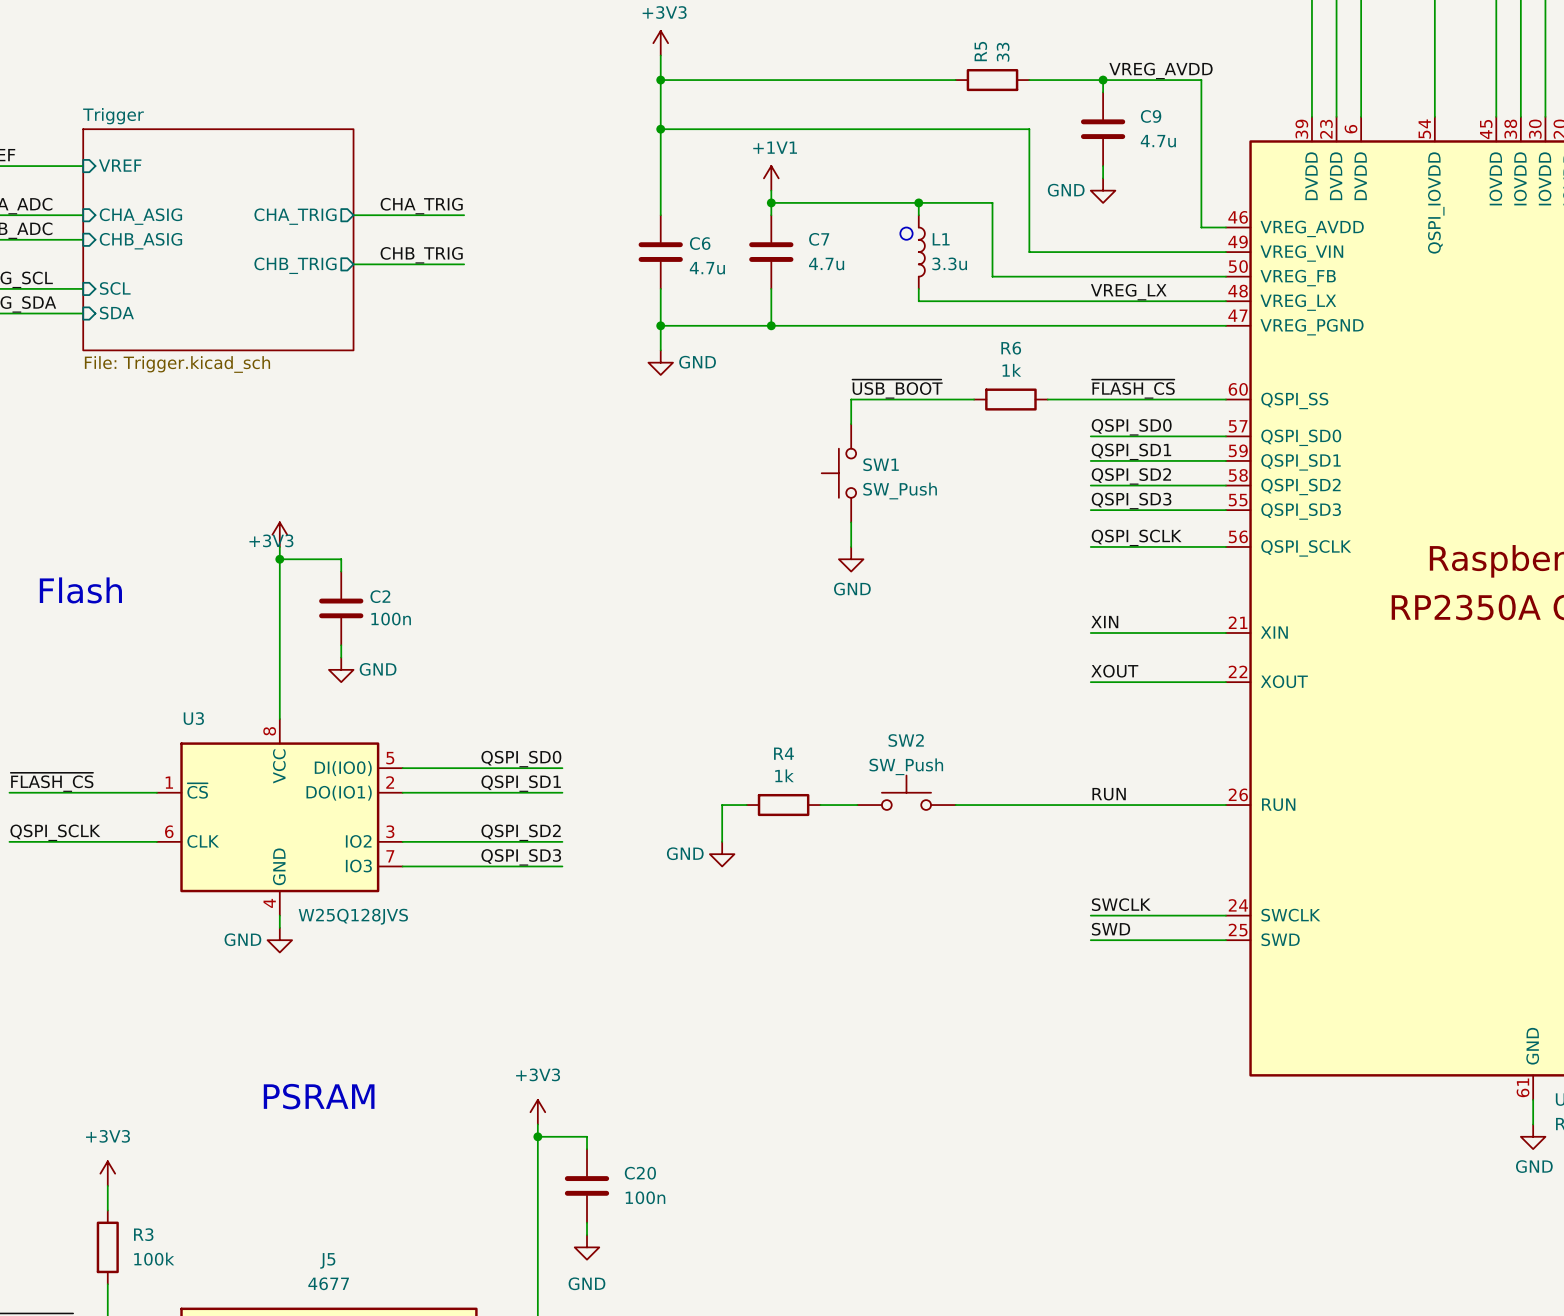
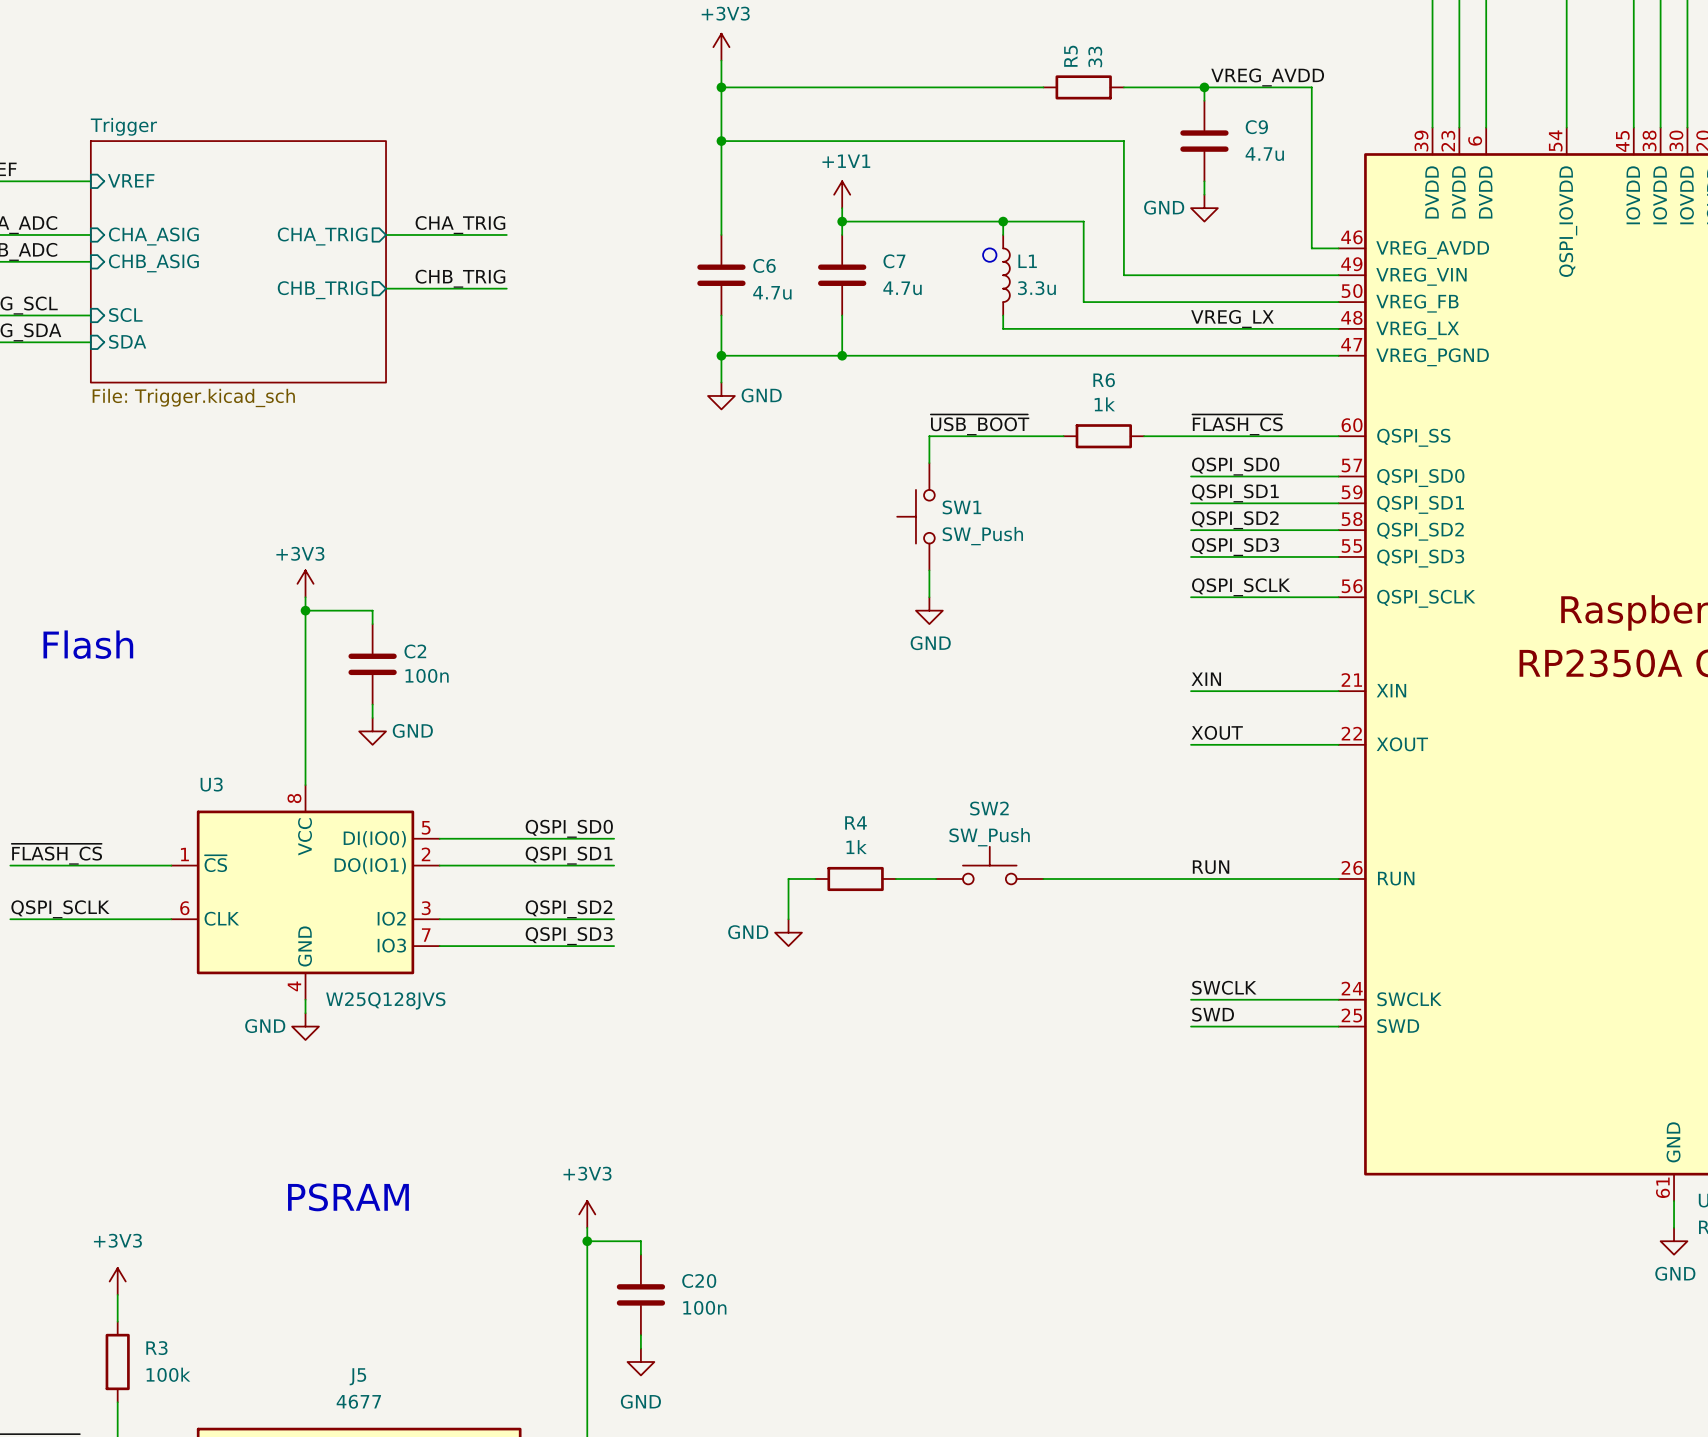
power symbol text position: +3V3 (271, 540) -> +3V3 (300, 553)

